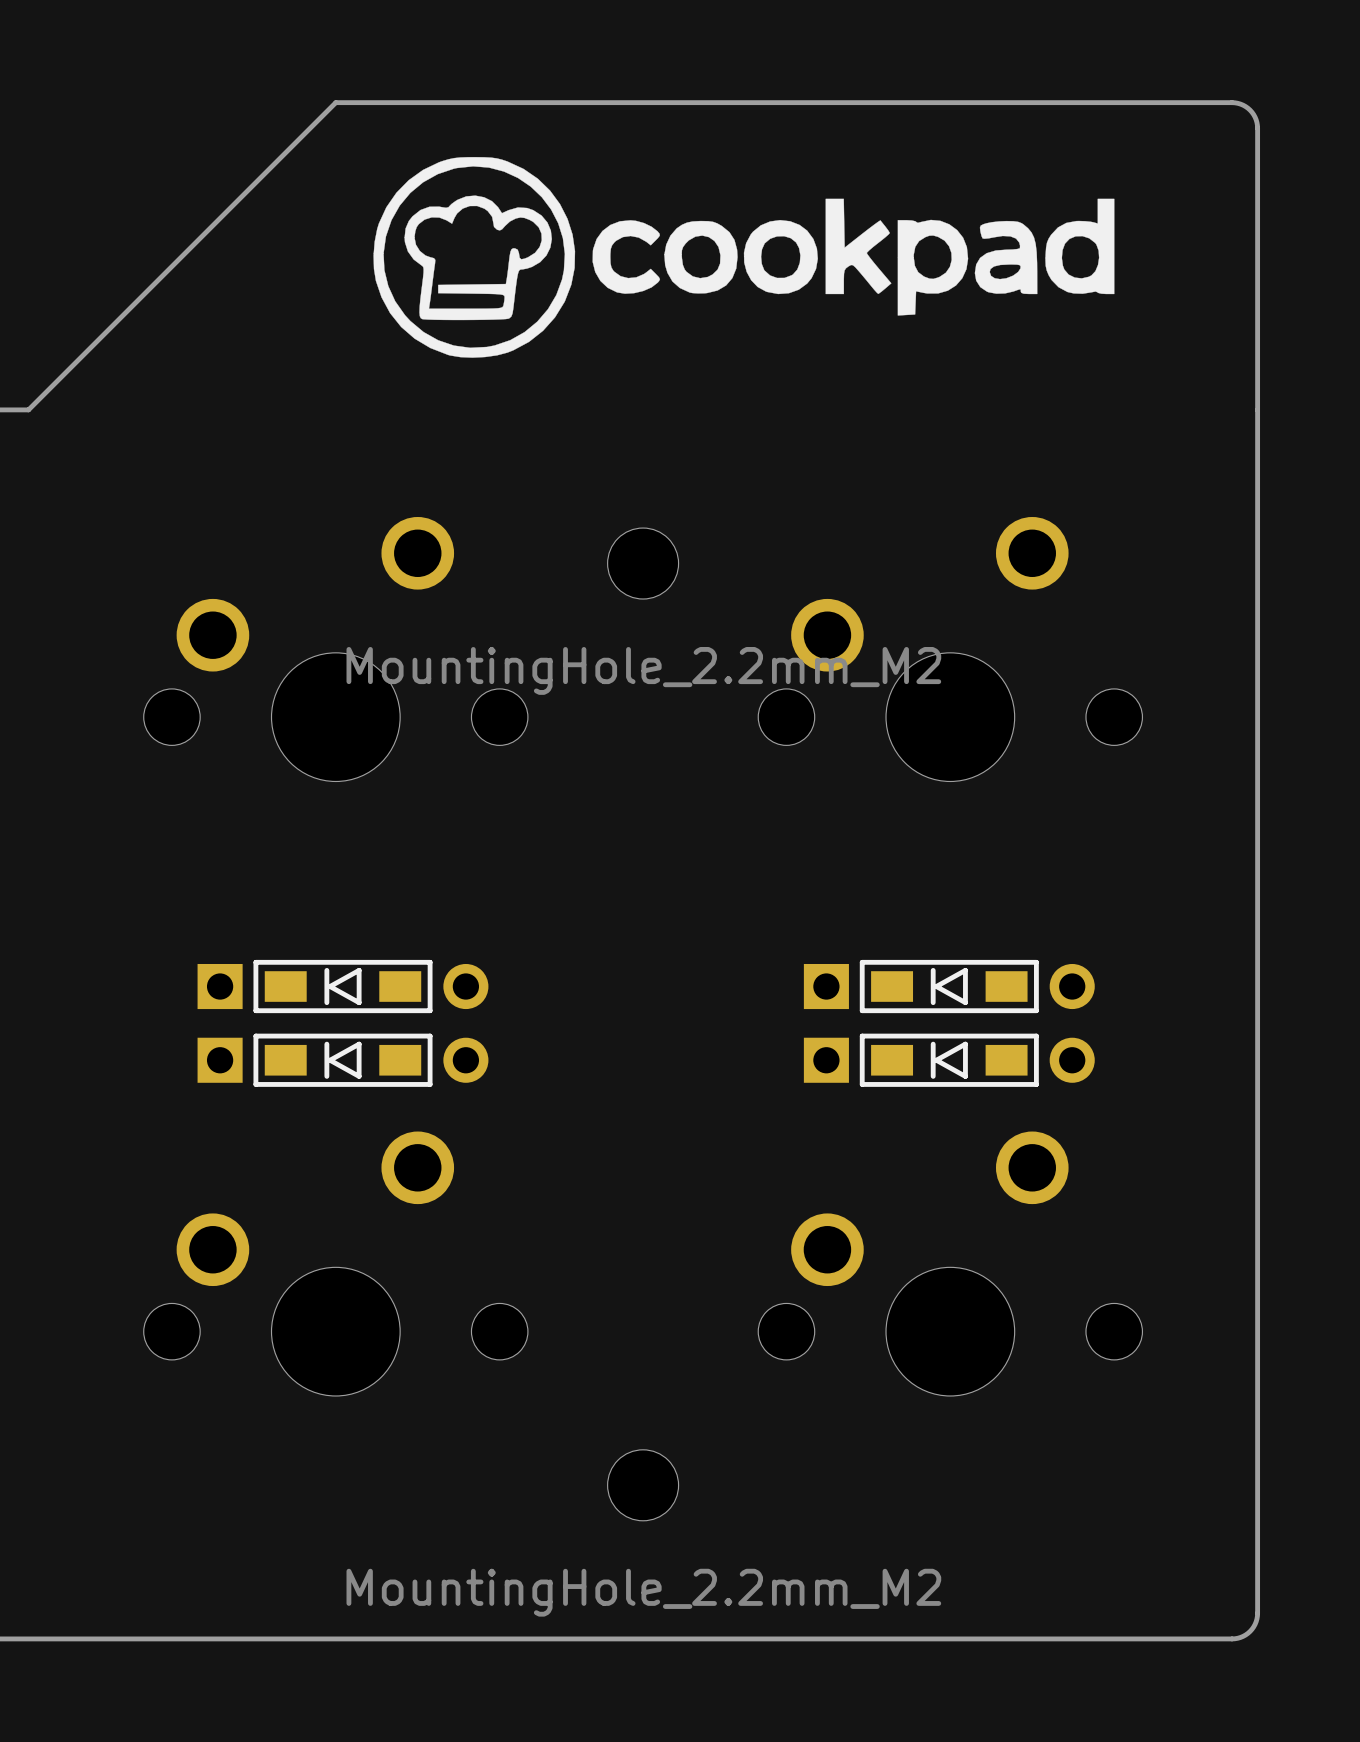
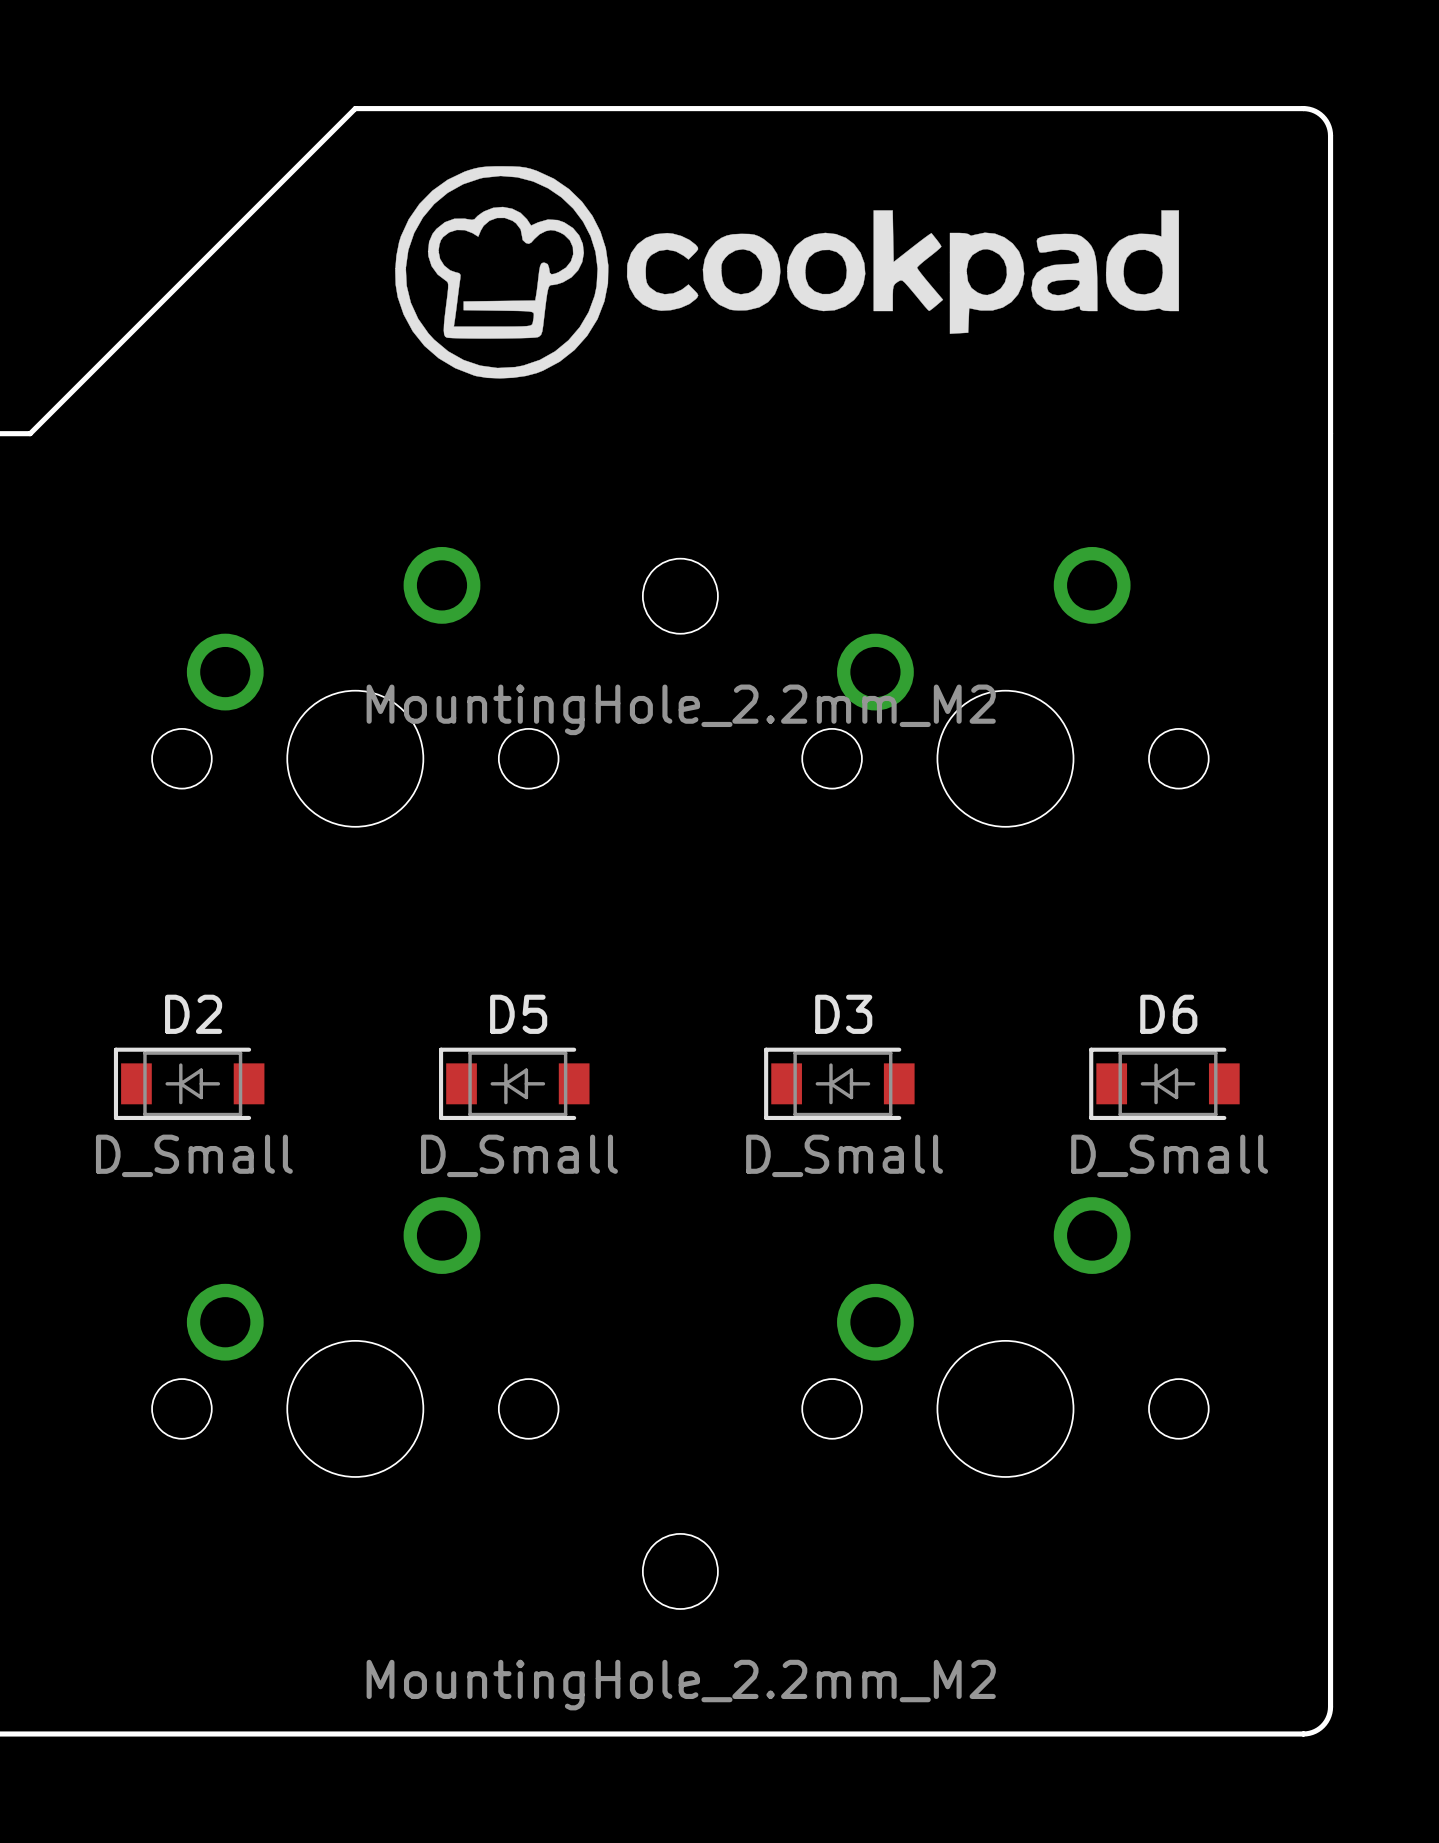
part: (342, 986) -> none
part: (949, 986) -> none
D2: none -> D_Small (189, 1083)
D5: none -> D_Small (514, 1083)
D3: none -> D_Small (839, 1083)
D6: none -> D_Small (1164, 1083)
part: (342, 1060) -> none
part: (949, 1060) -> none

